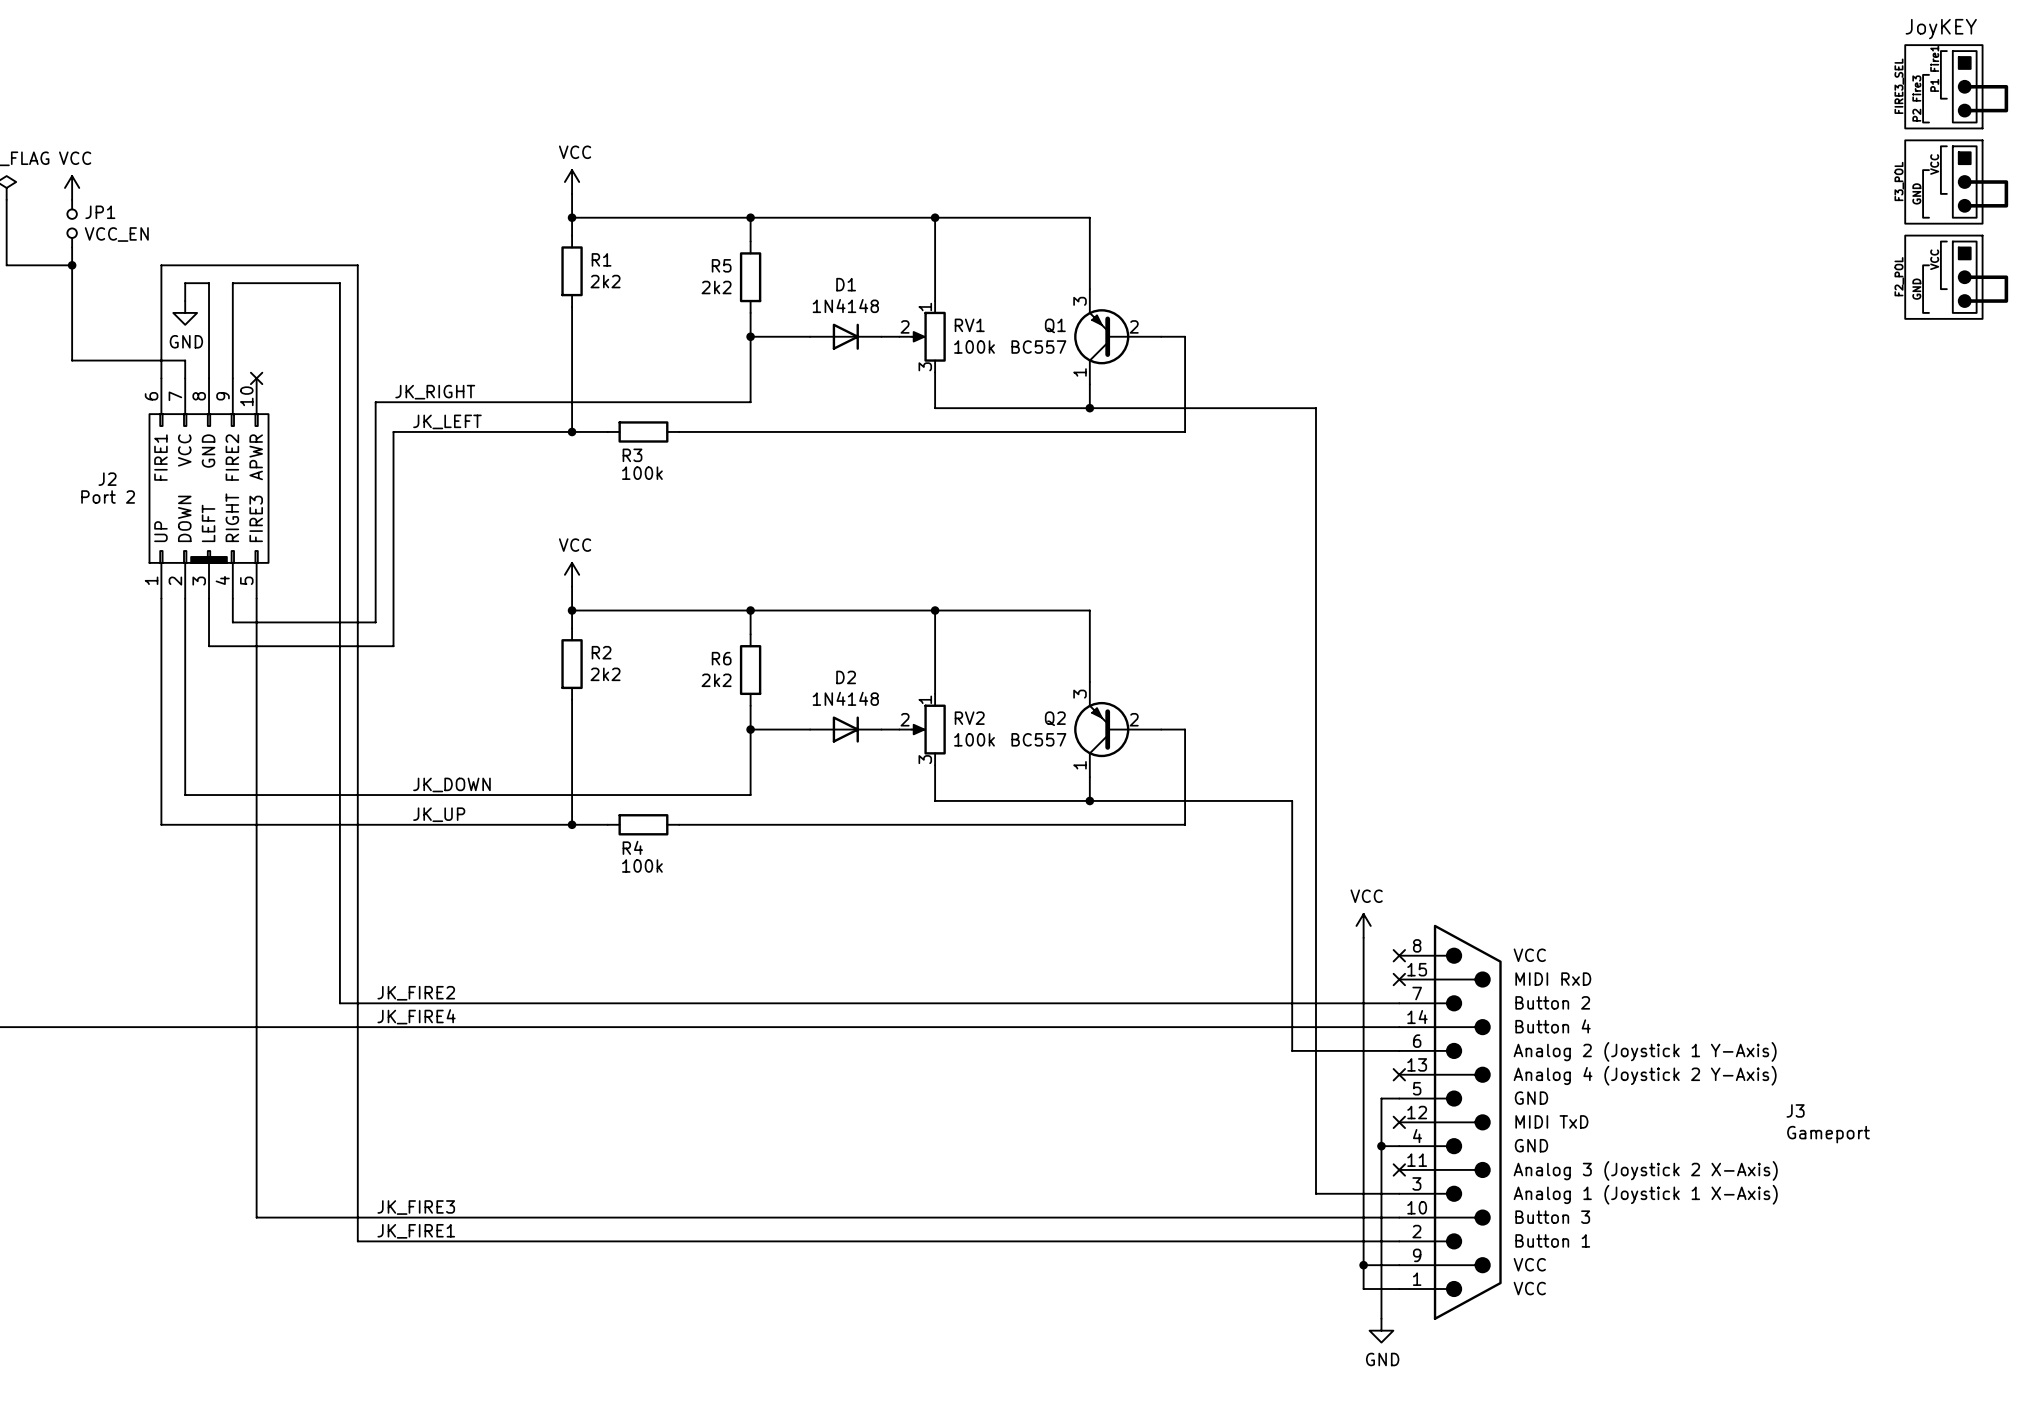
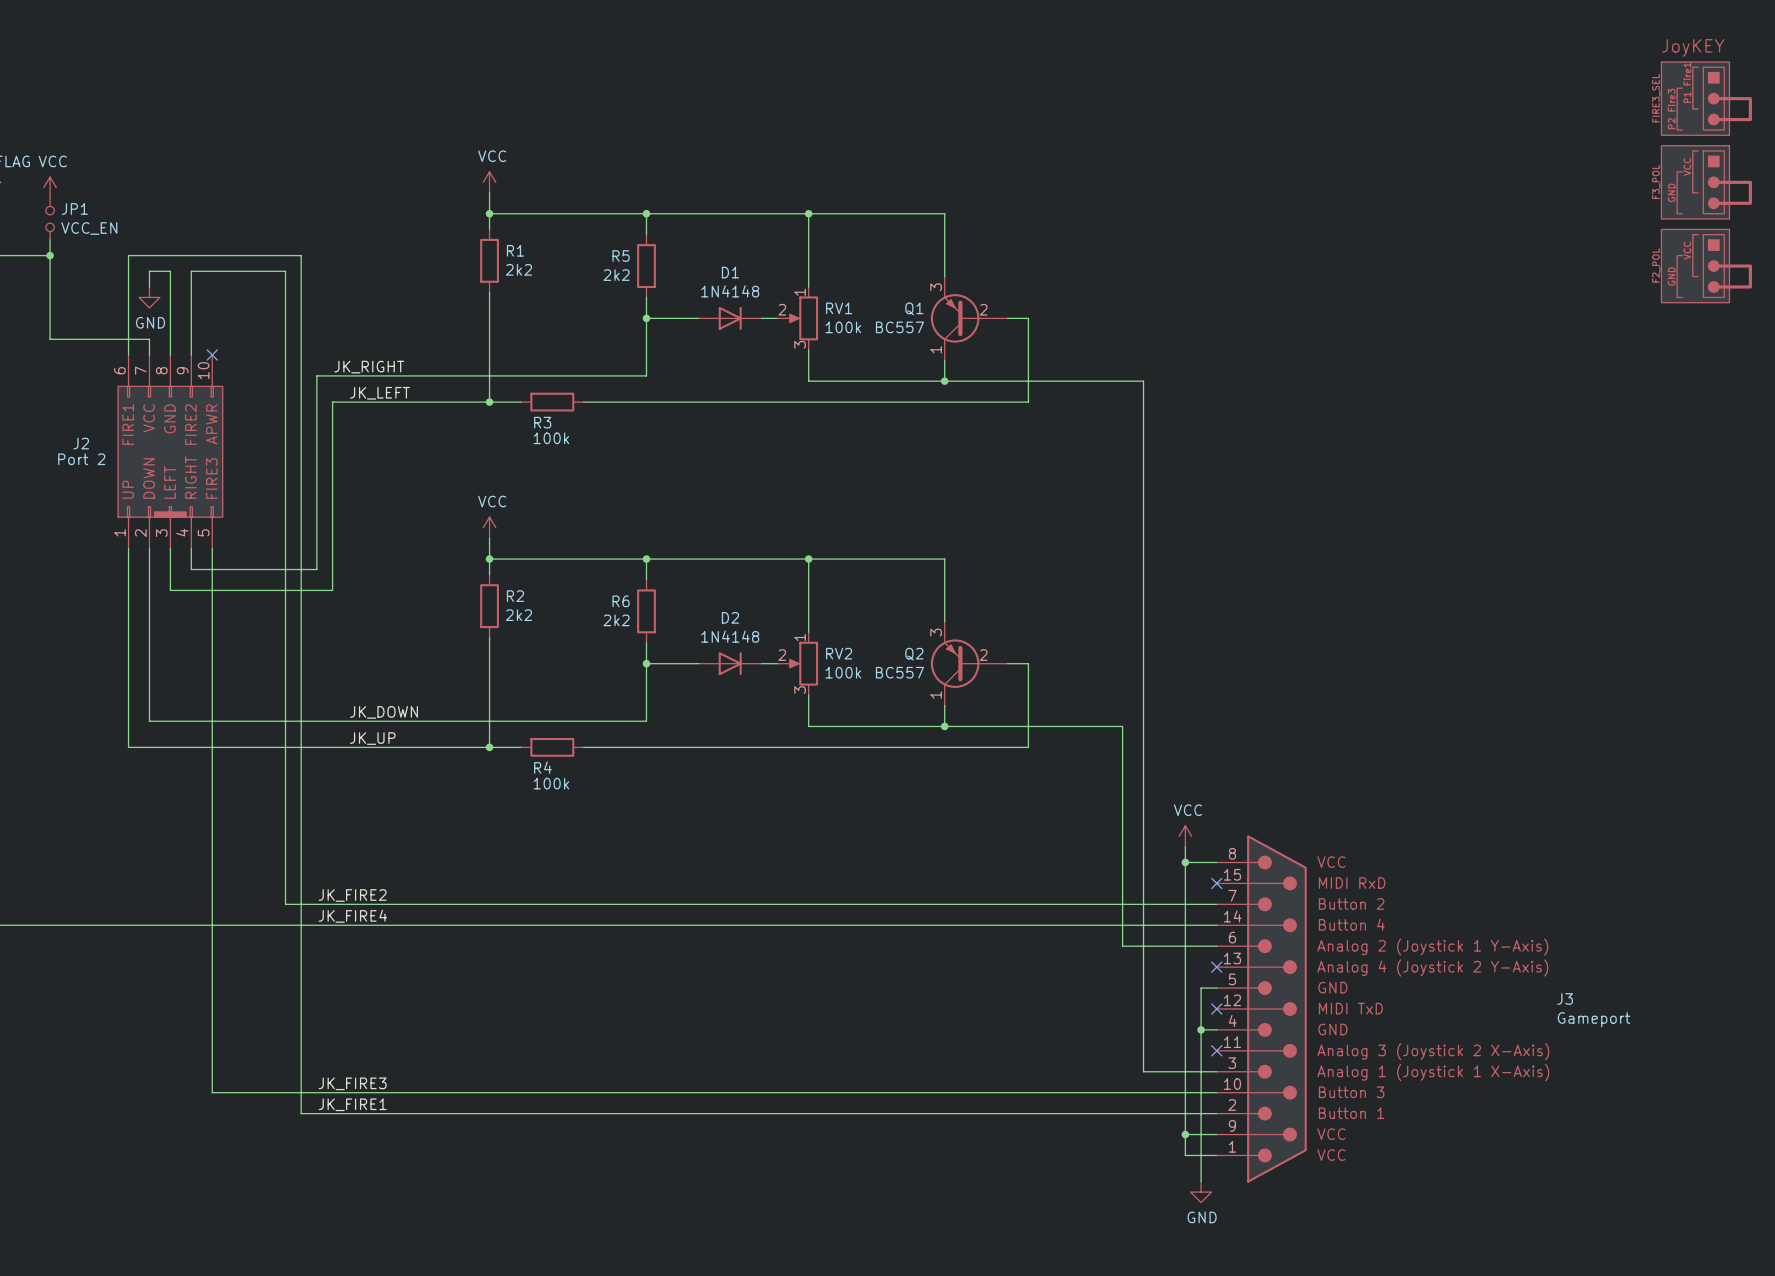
wire: none -> (1185, 862) (1216, 862)
junction: none -> (1185, 862)
no-connect mark: (1399, 955) -> none

